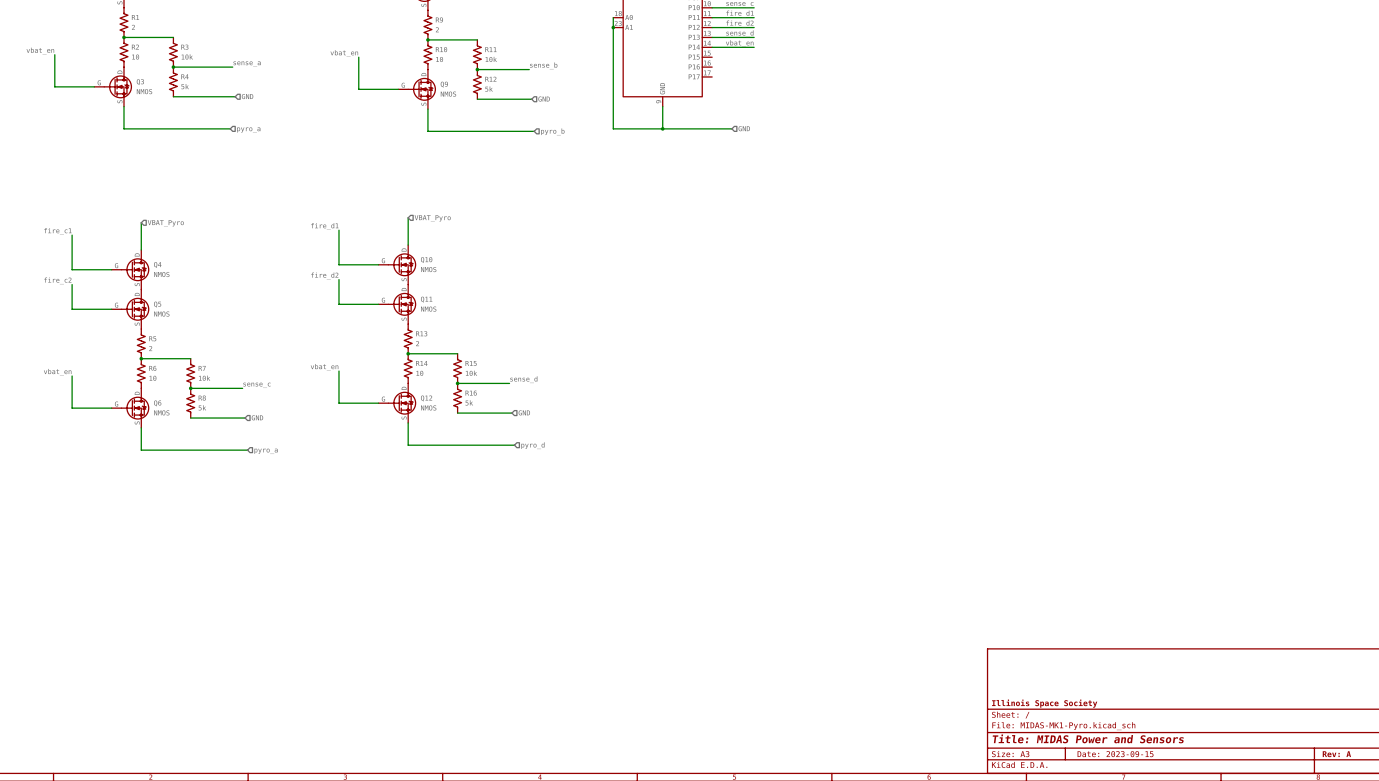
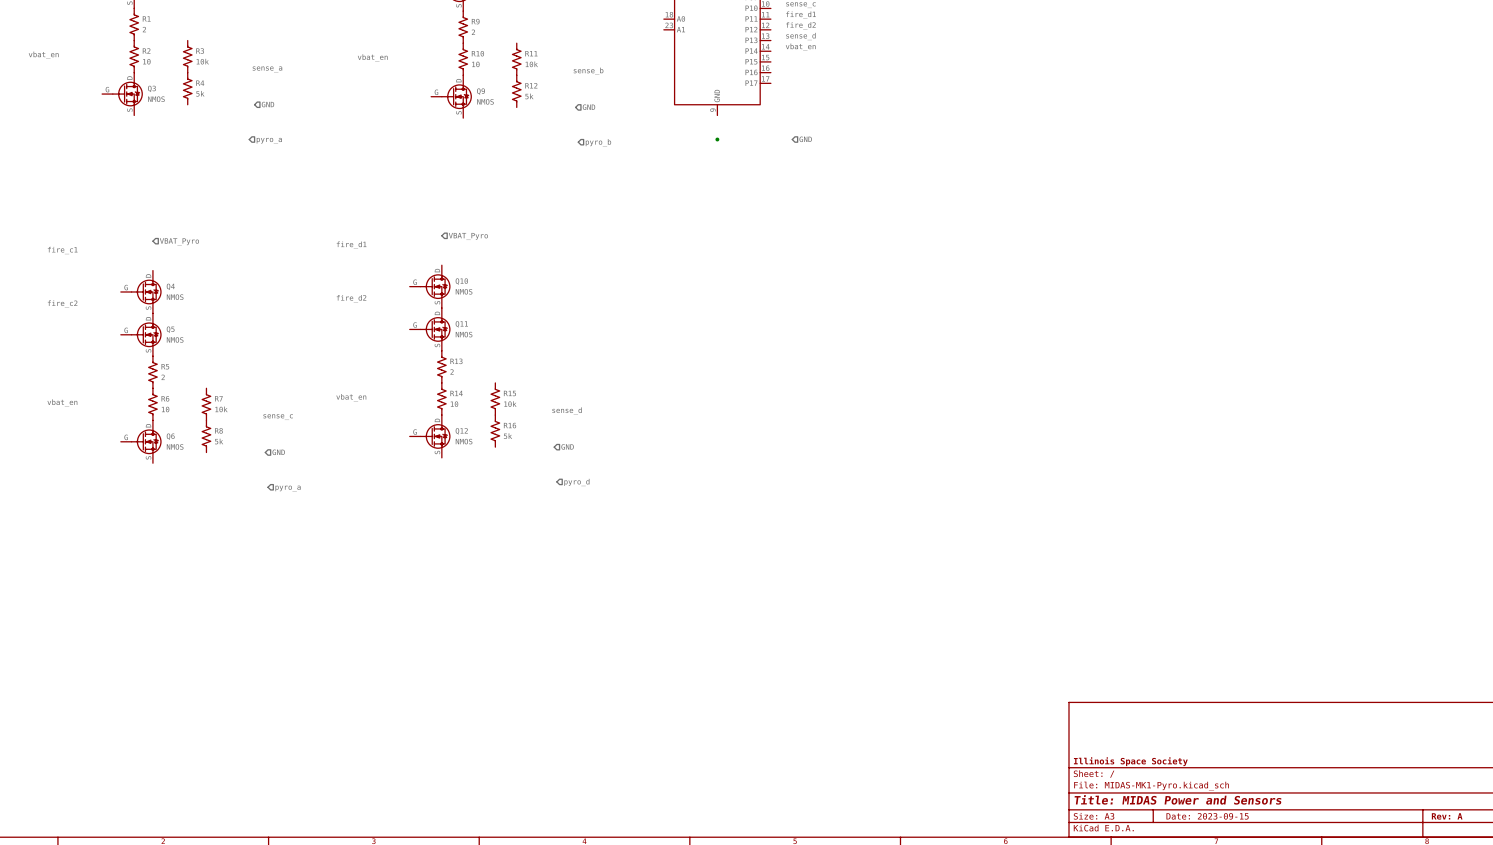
wire: (712, 7) (754, 7) -> none
wire: (613, 17) (613, 128) (731, 128) -> none
wire: (712, 17) (754, 17) -> none
junction: (613, 27) -> none
wire: (712, 27) (754, 27) -> none
wire: (123, 37) (173, 37) -> none
junction: (123, 37) -> none
wire: (712, 37) (754, 37) -> none
wire: (427, 39) (477, 39) -> none
junction: (427, 39) -> none
wire: (712, 47) (754, 47) -> none
wire: (54, 54) (54, 86) (94, 86) -> none
wire: (358, 57) (358, 89) (398, 89) -> none
wire: (173, 67) (232, 67) -> none
junction: (173, 67) -> none
wire: (477, 69) (529, 69) -> none
junction: (477, 69) -> none
wire: (173, 96) (235, 96) -> none
wire: (477, 99) (531, 99) -> none
wire: (123, 106) (123, 128) (230, 128) -> none
wire: (662, 106) (662, 128) -> none
wire: (427, 109) (427, 131) (534, 131) -> none
wire: (408, 217) (408, 245) -> none
wire: (141, 222) (141, 249) -> none
wire: (338, 230) (338, 264) (378, 264) -> none
wire: (72, 235) (72, 269) (111, 269) -> none
wire: (338, 279) (338, 304) (378, 304) -> none
wire: (72, 284) (72, 309) (111, 309) -> none
wire: (408, 353) (457, 353) -> none
junction: (408, 353) -> none
wire: (141, 358) (190, 358) -> none
junction: (141, 358) -> none
wire: (338, 371) (338, 403) (378, 403) -> none
wire: (72, 376) (72, 408) (111, 408) -> none
wire: (457, 383) (509, 383) -> none
junction: (457, 383) -> none
wire: (190, 388) (242, 388) -> none
junction: (190, 388) -> none
wire: (457, 413) (511, 413) -> none
wire: (190, 418) (245, 418) -> none
wire: (408, 422) (408, 445) (514, 445) -> none
wire: (141, 427) (141, 450) (247, 450) -> none

